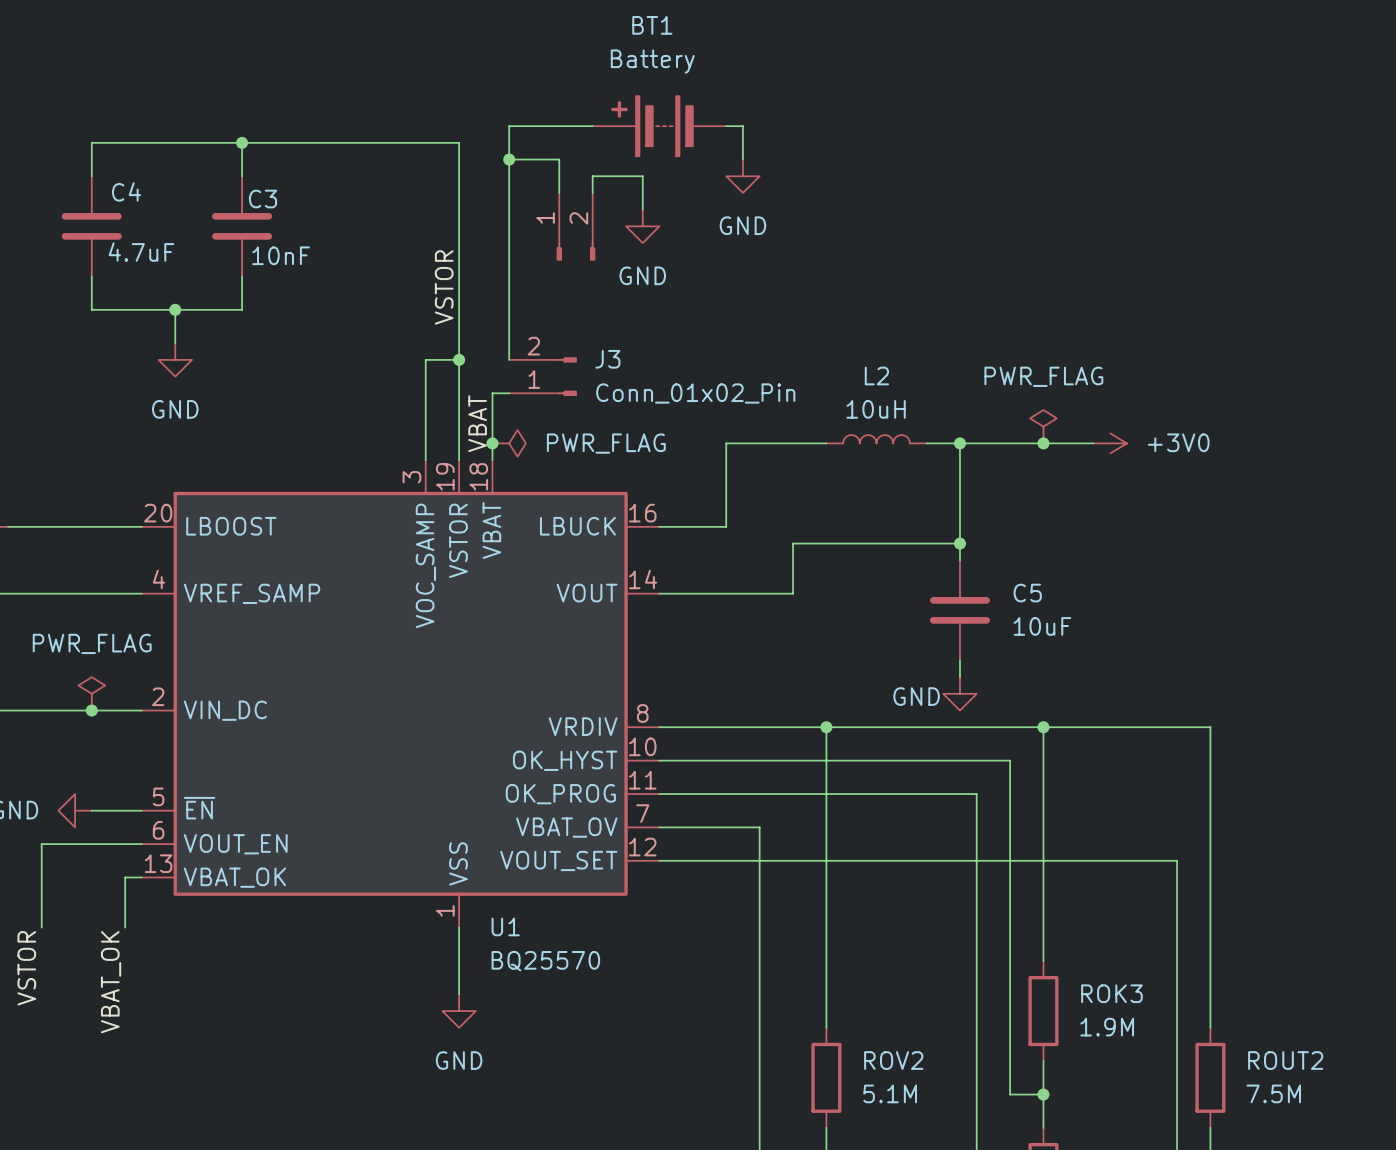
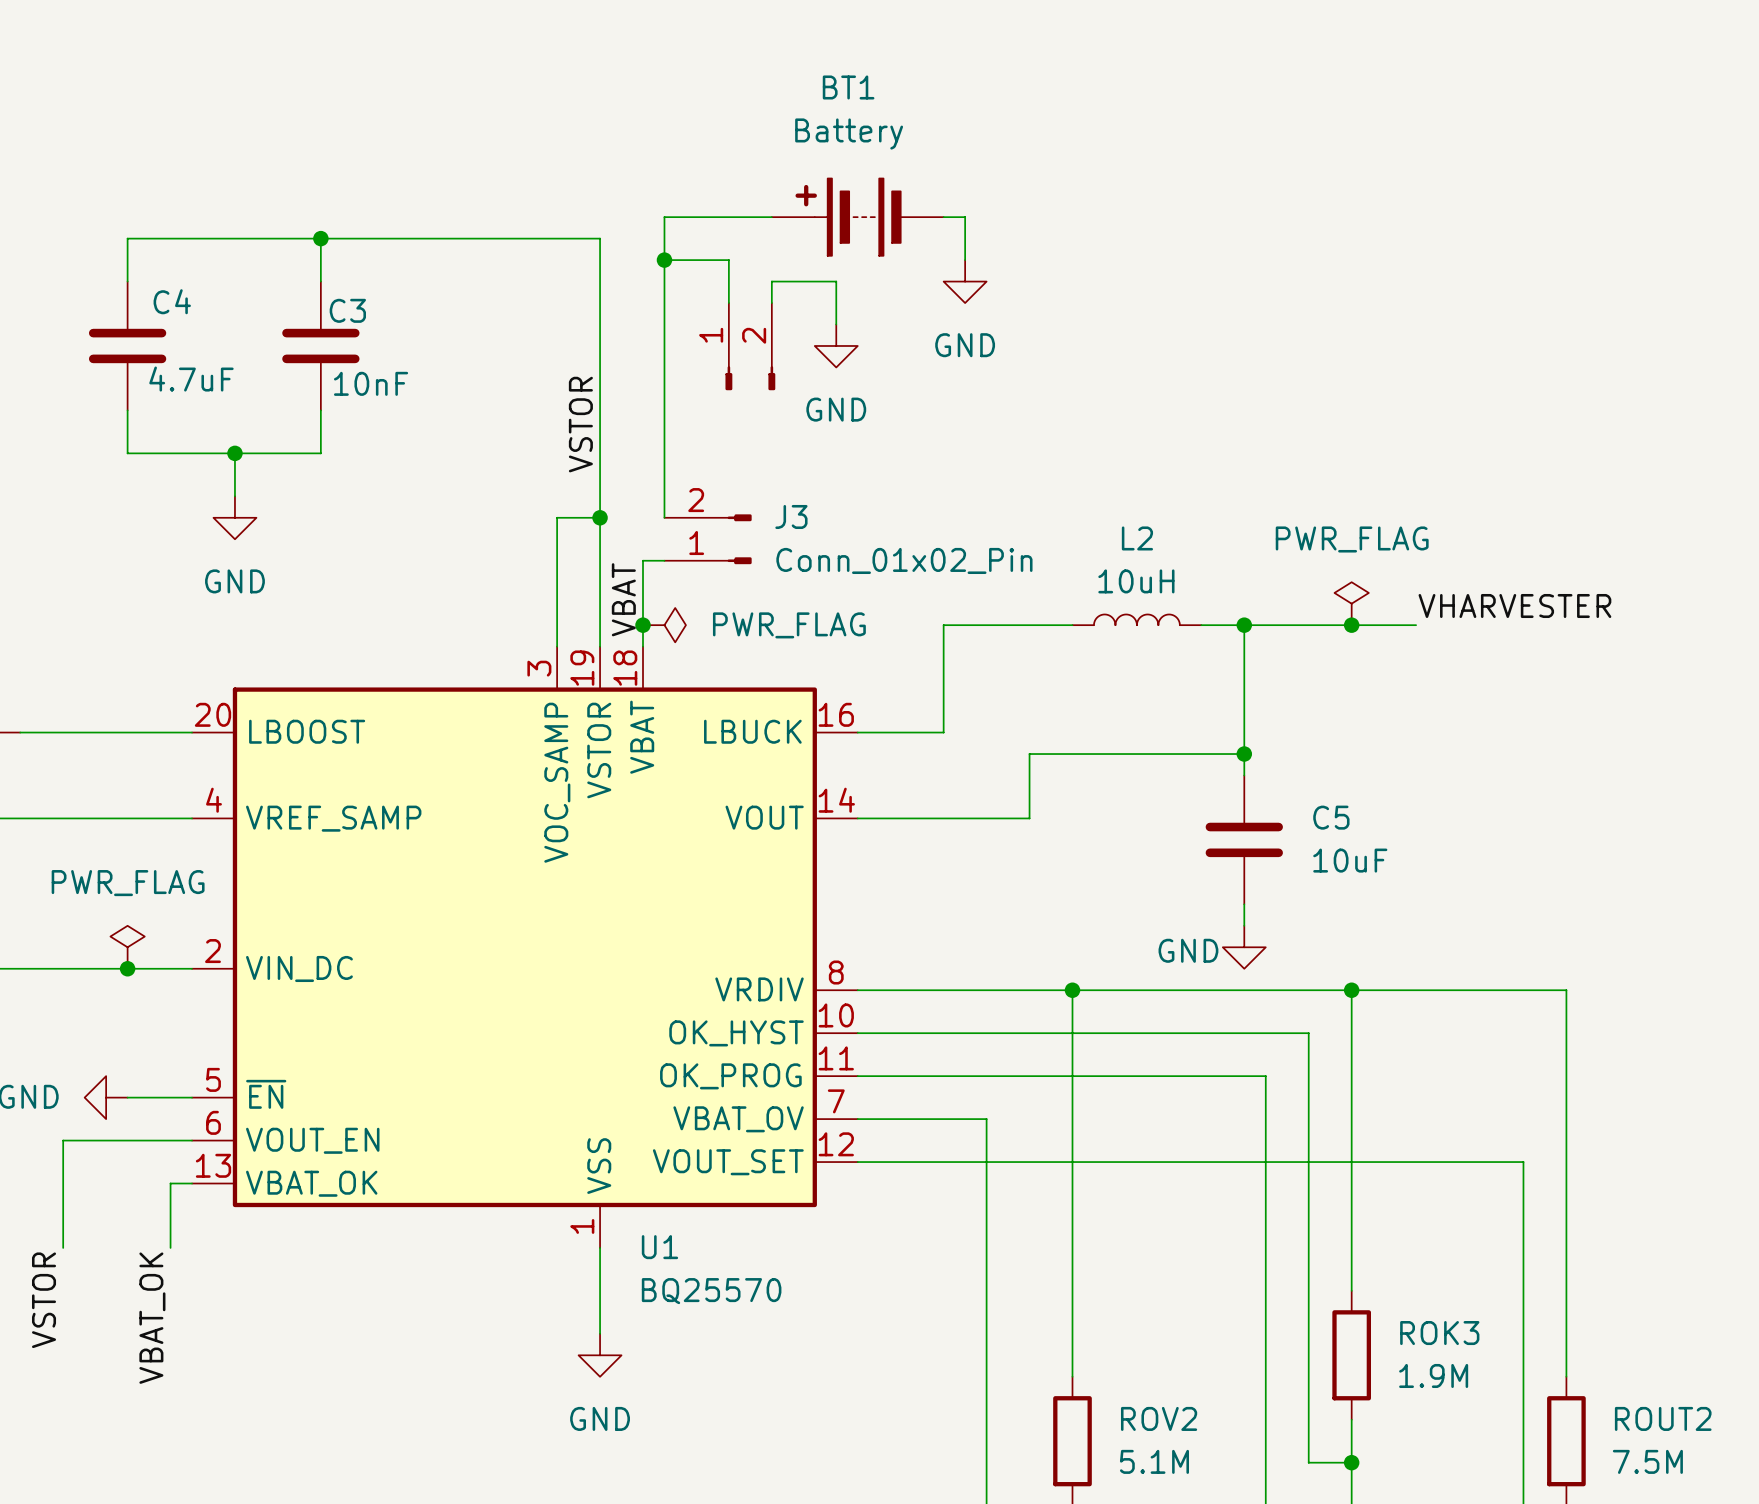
label: none -> VHARVESTER (1514, 606)
power symbol: +3V0 (1110, 443) -> none

